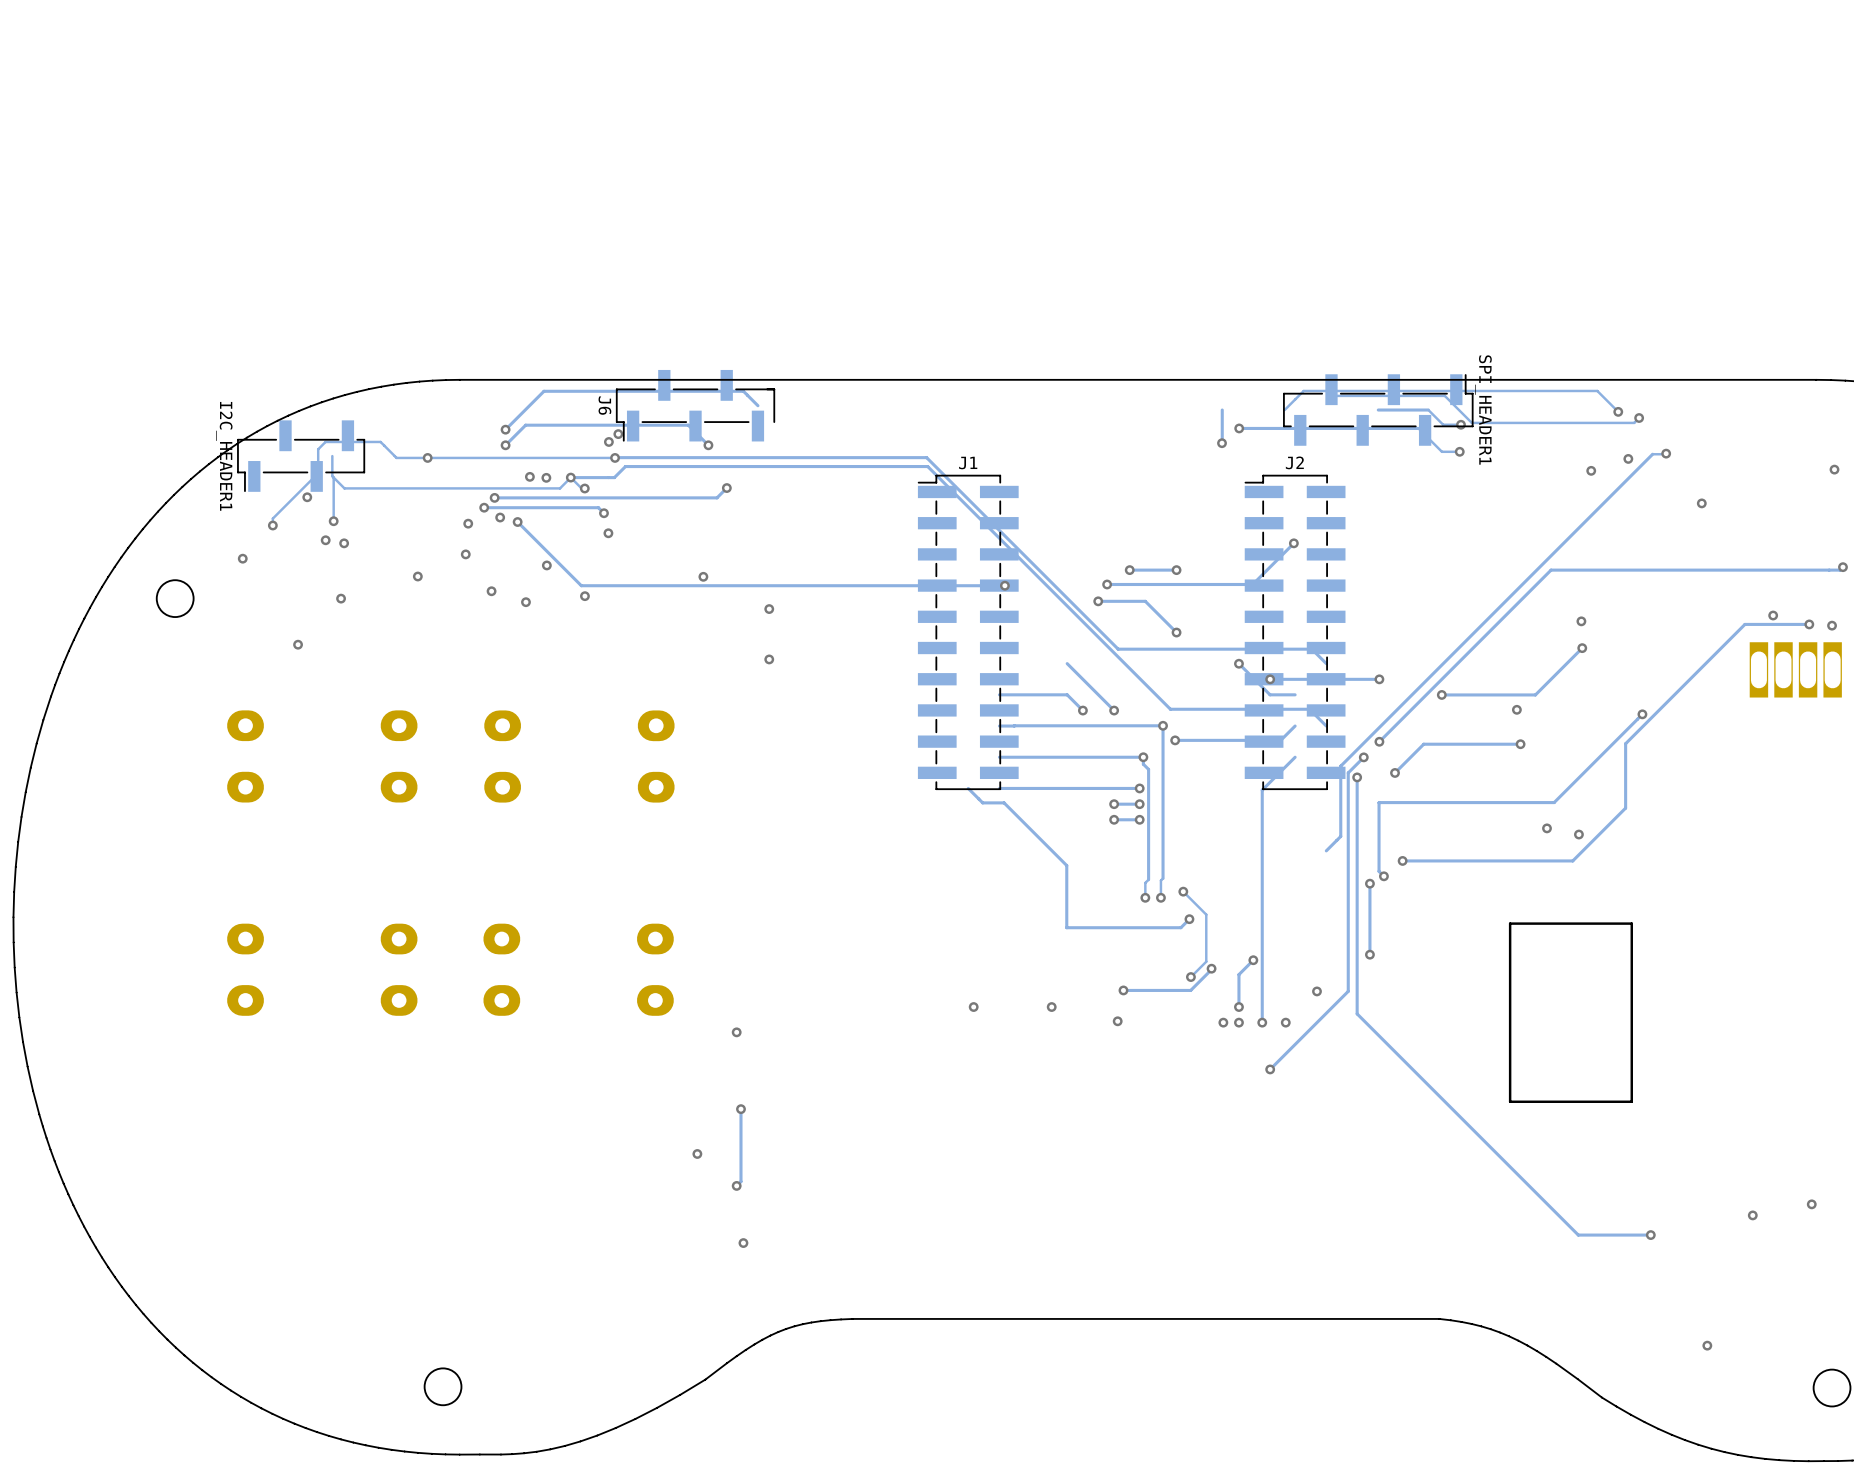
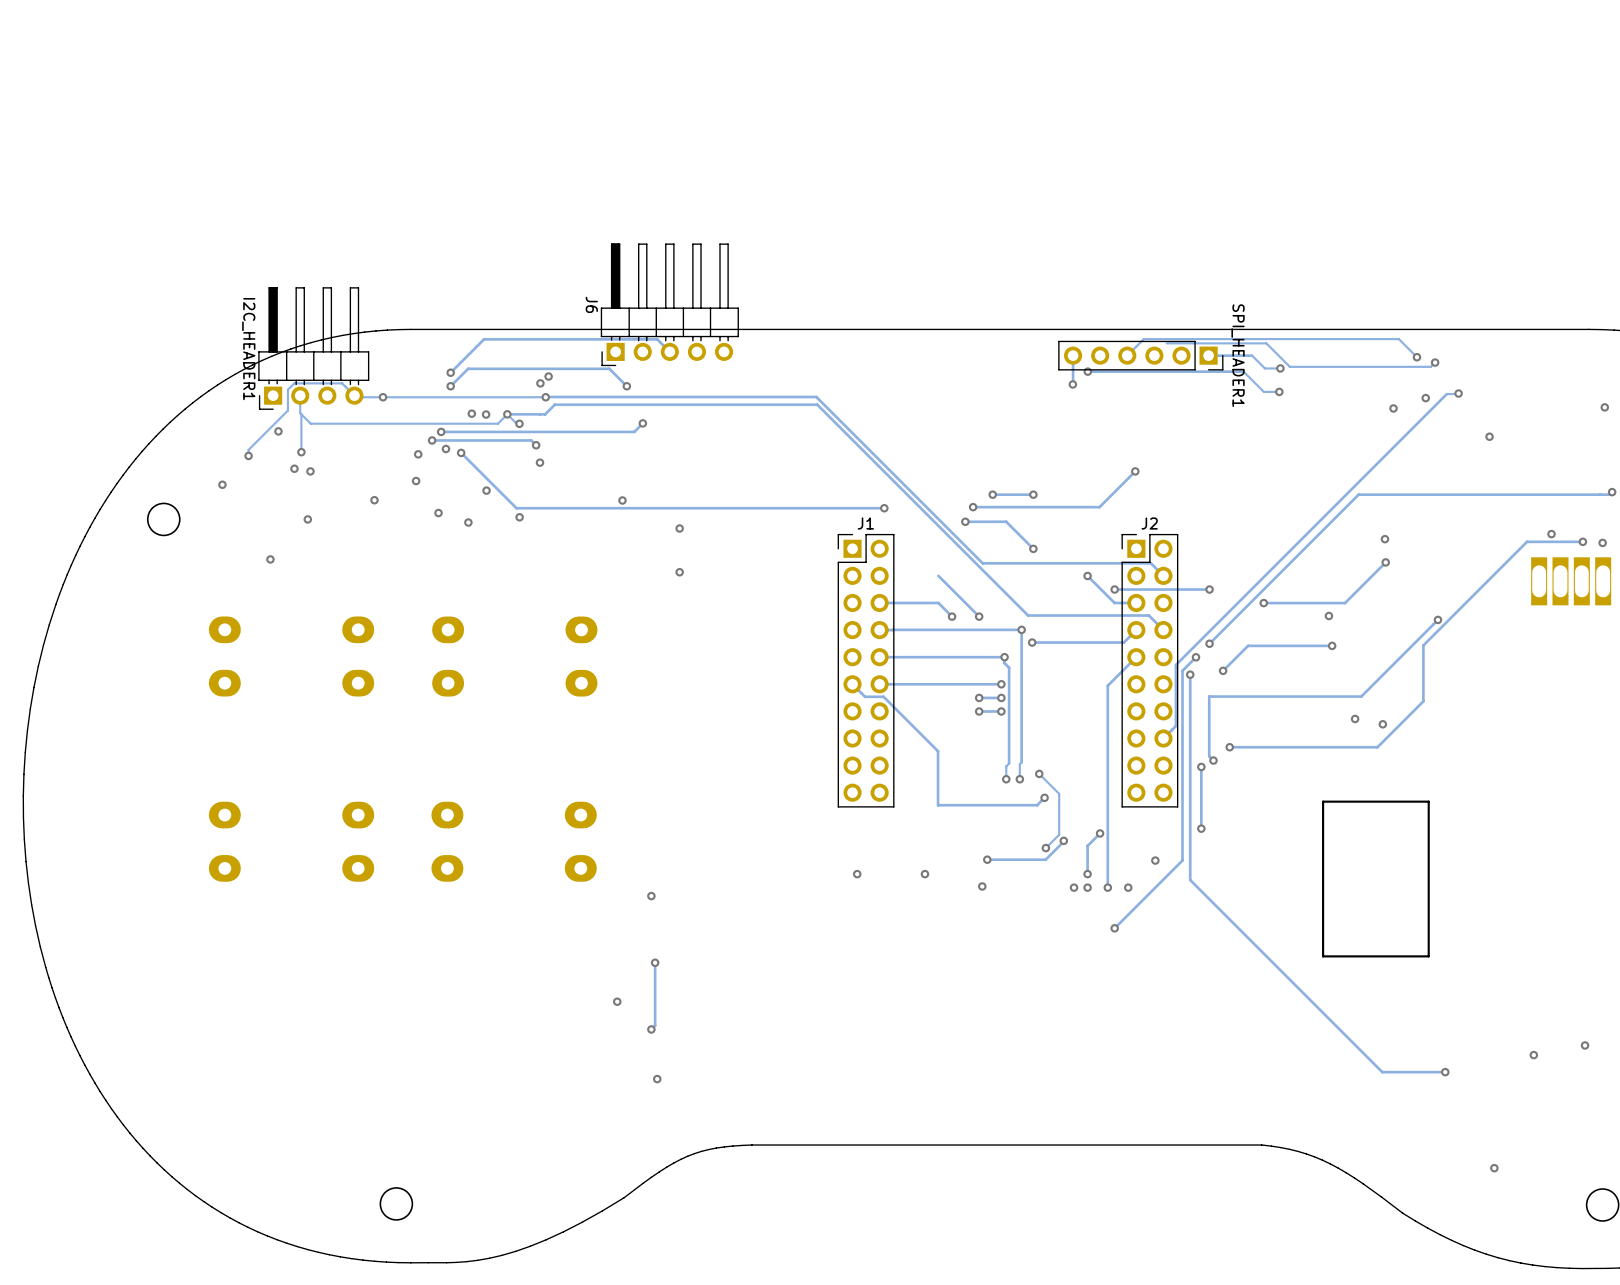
J6 footprint: [616, 369, 776, 442] -> [600, 243, 739, 367]
SPI_HEADER1 footprint: [1283, 374, 1474, 446] -> [1058, 340, 1224, 371]
I2C_HEADER1 footprint: [237, 420, 366, 492] -> [258, 287, 370, 410]
J1 footprint: [917, 474, 1019, 790] -> [837, 533, 895, 808]
J2 footprint: [1244, 474, 1346, 790] -> [1121, 533, 1179, 808]

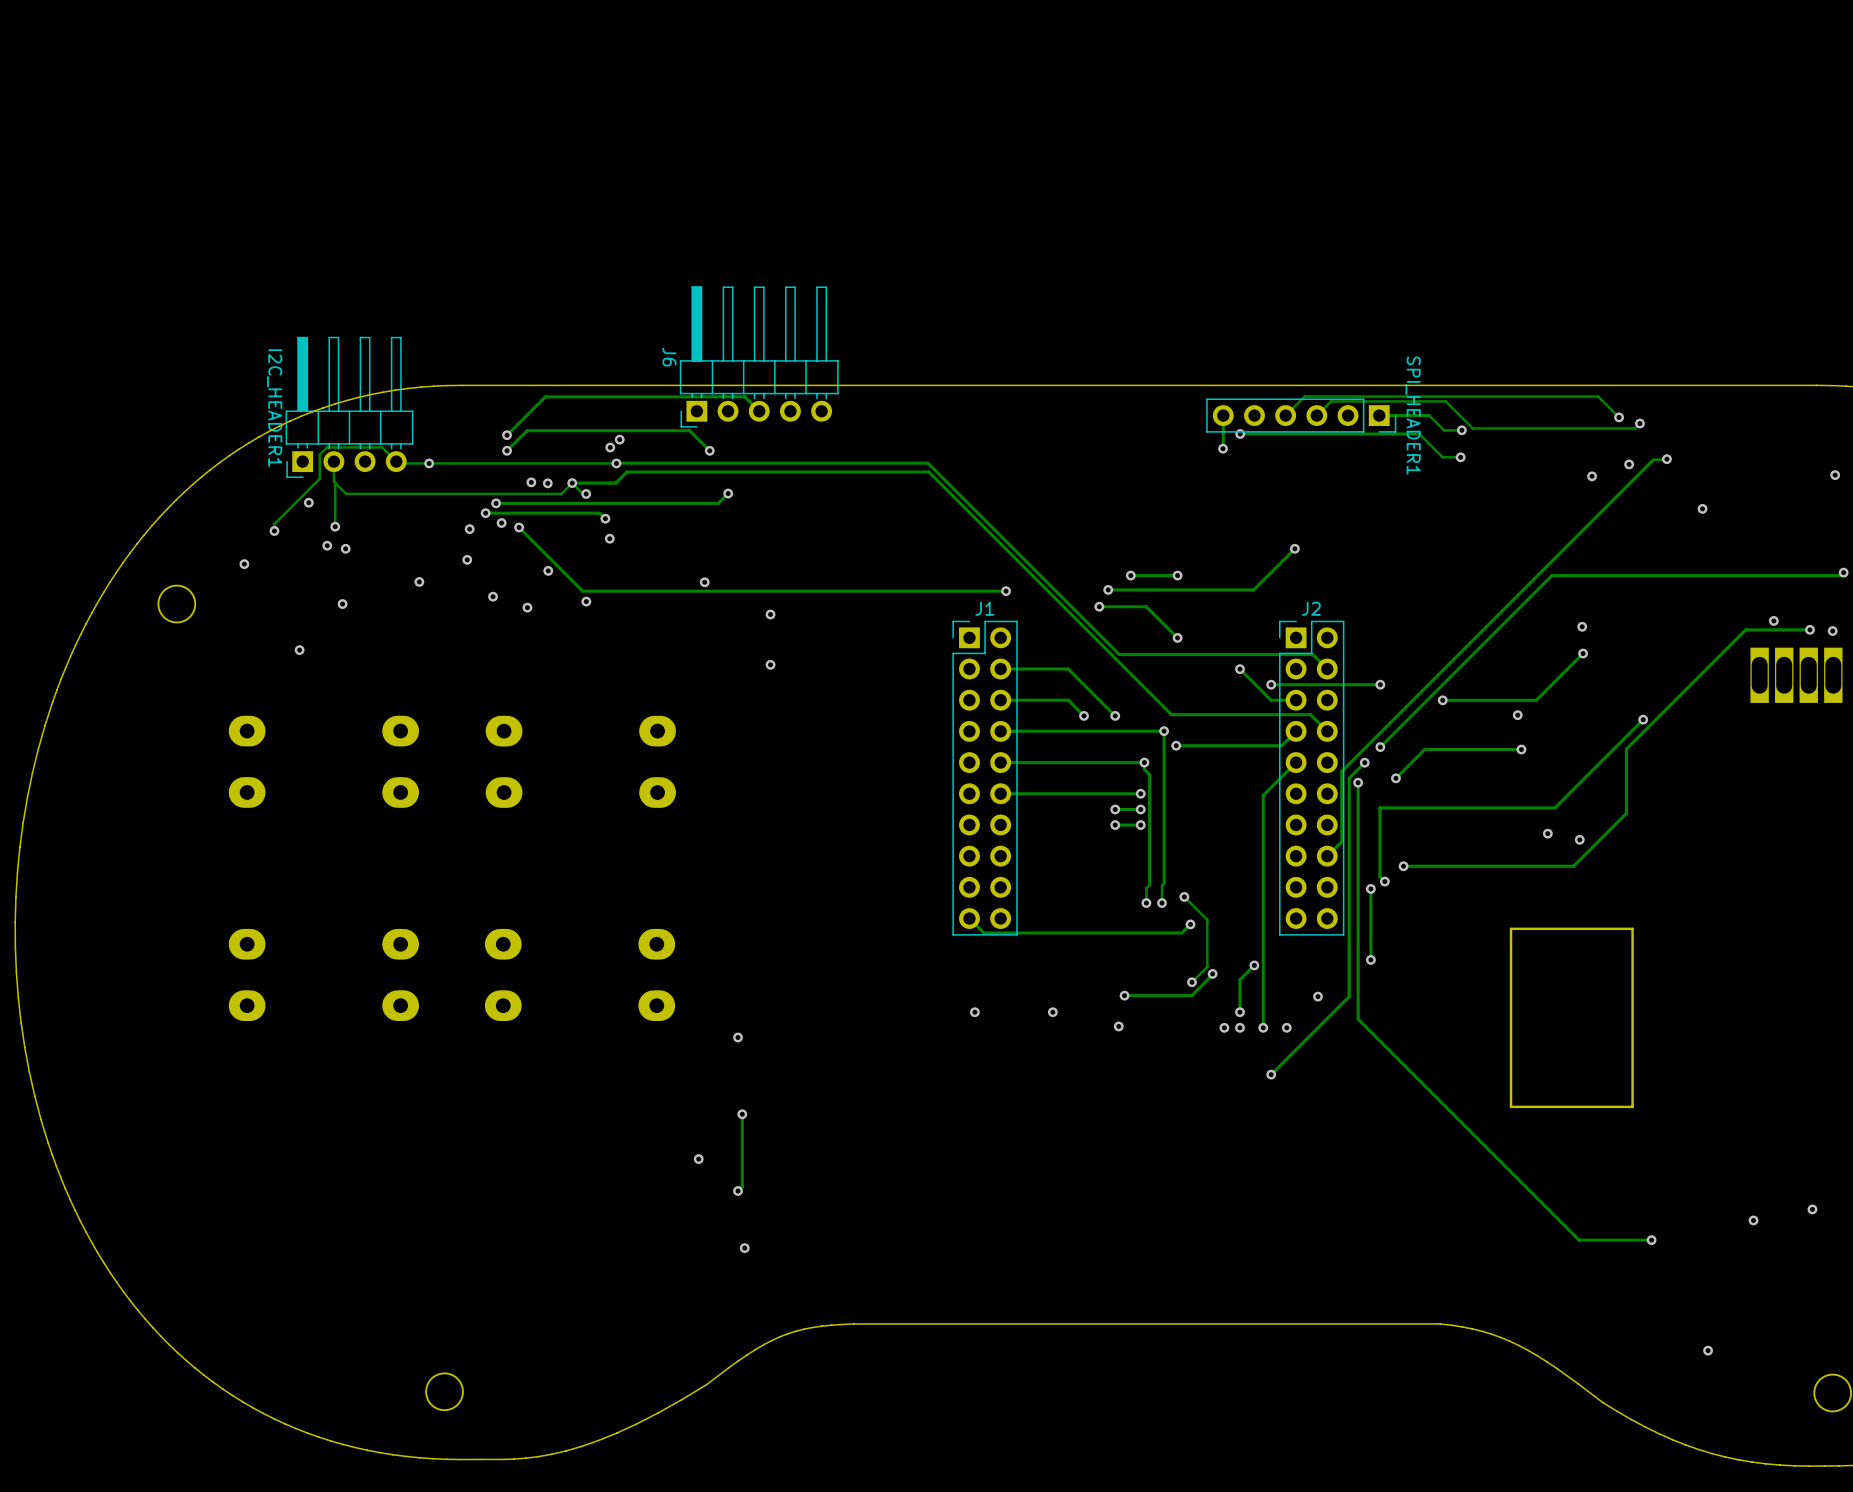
track: none -> (1330, 401) (1316, 415)
track: none -> (1068, 669) (1000, 669)
track: (852, 684) (865, 696) (883, 696) (938, 751) (938, 805) -> (969, 918) (983, 932) (1067, 932)

